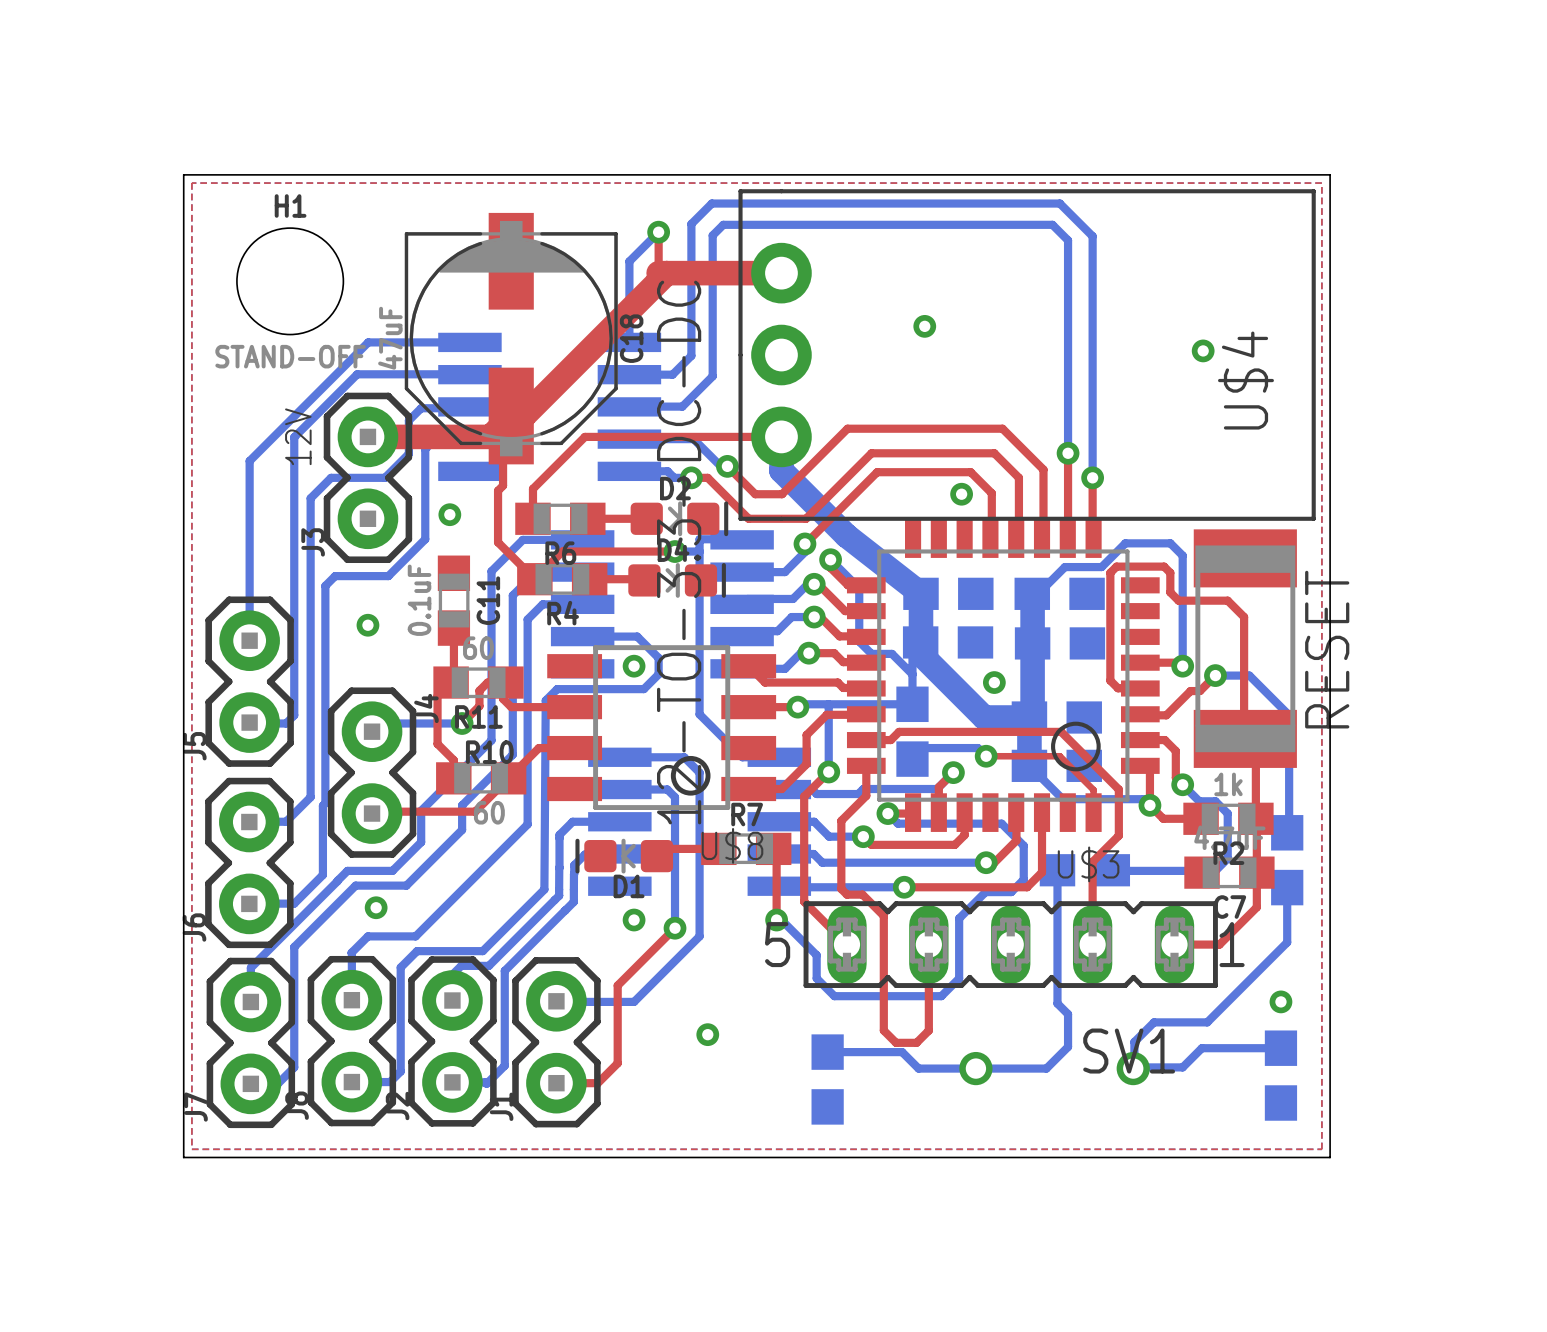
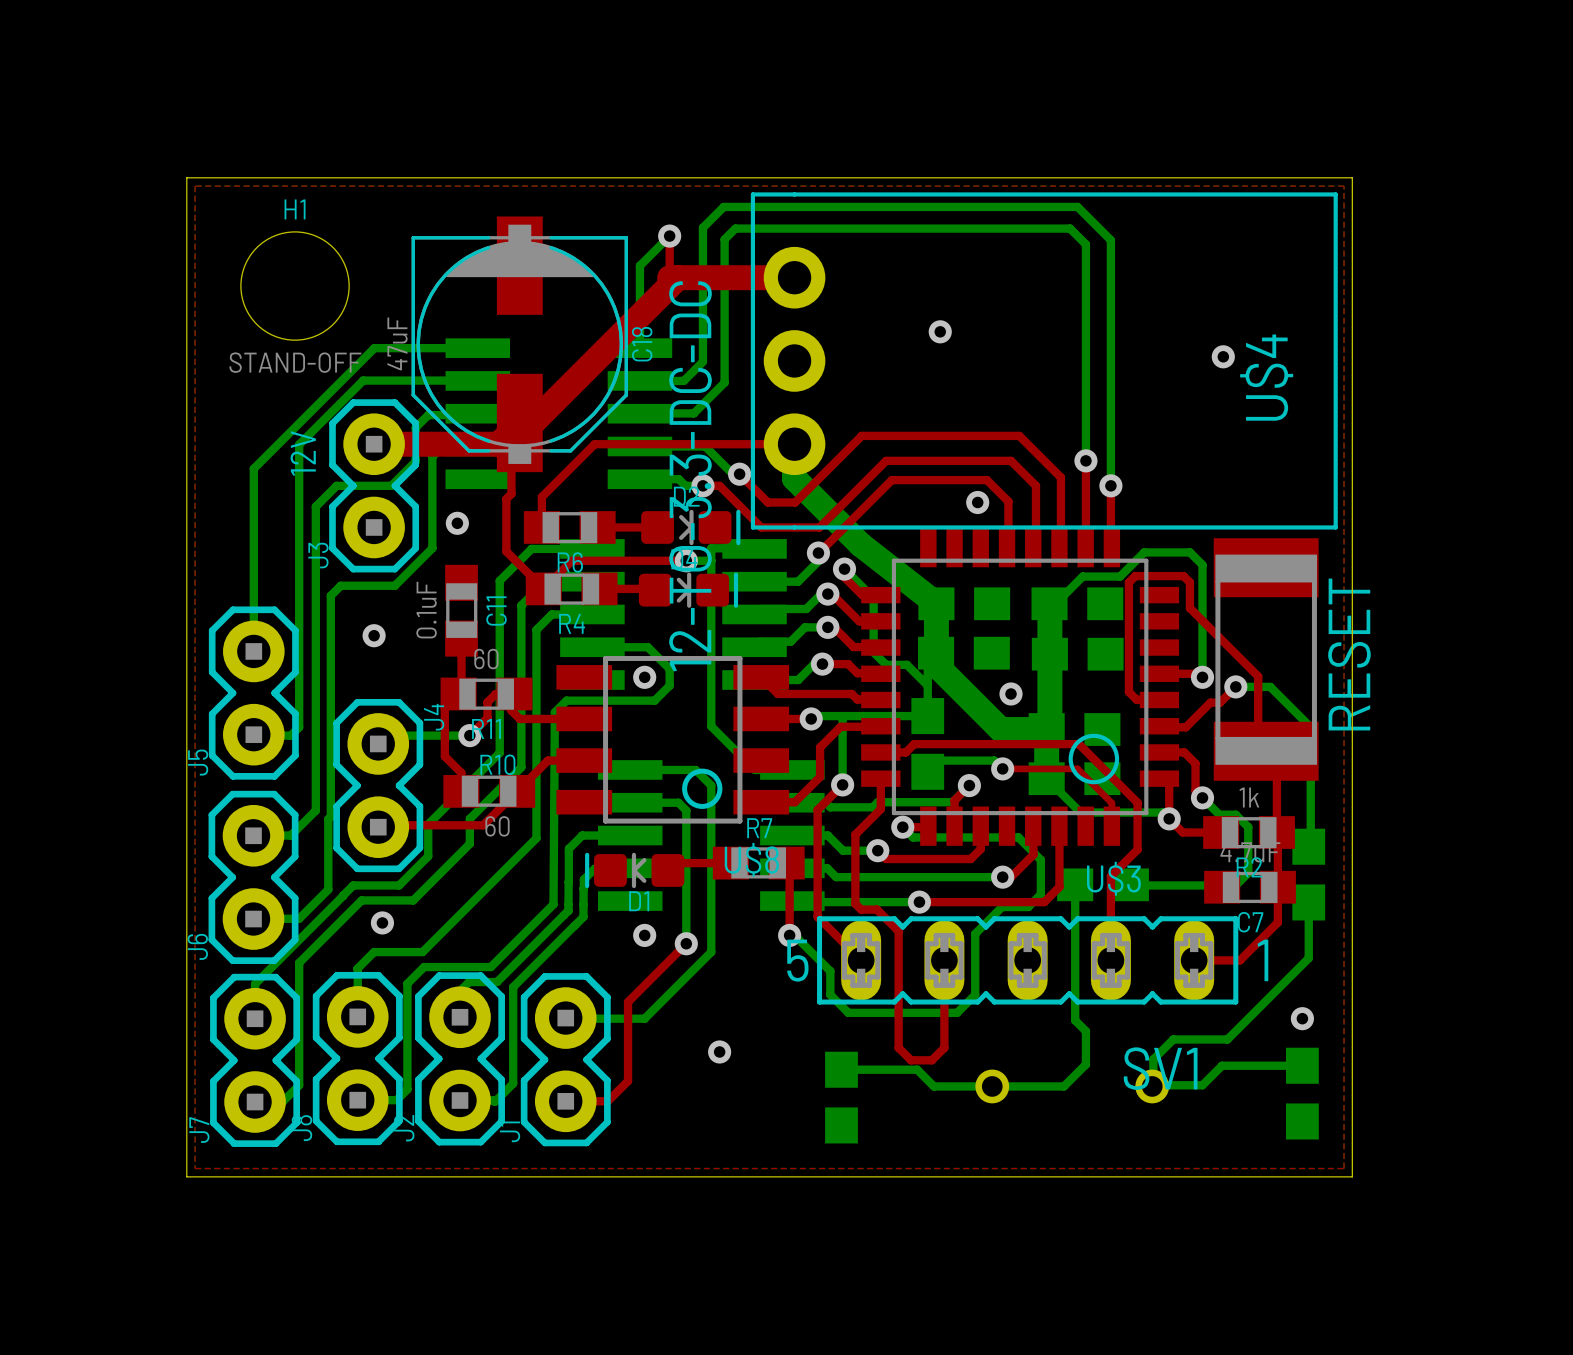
top track: (1170, 592) (1178, 600) (1227, 600) (1244, 617) (1245, 738) -> (1189, 602) (1189, 608) (1258, 676) (1258, 751)

